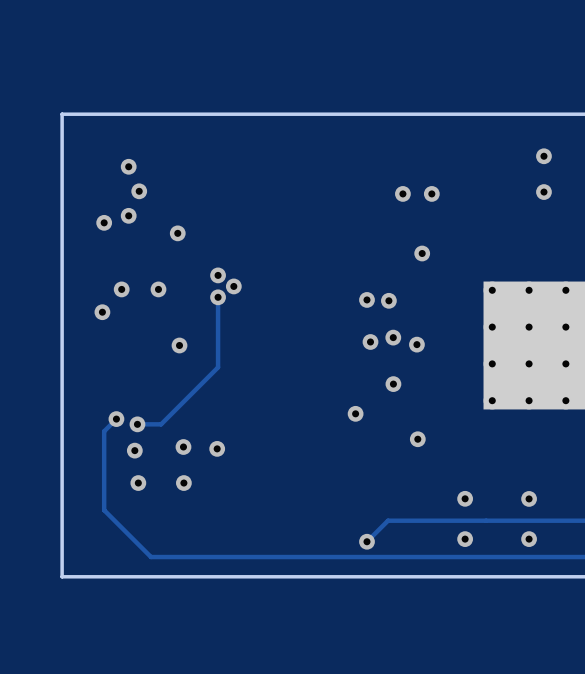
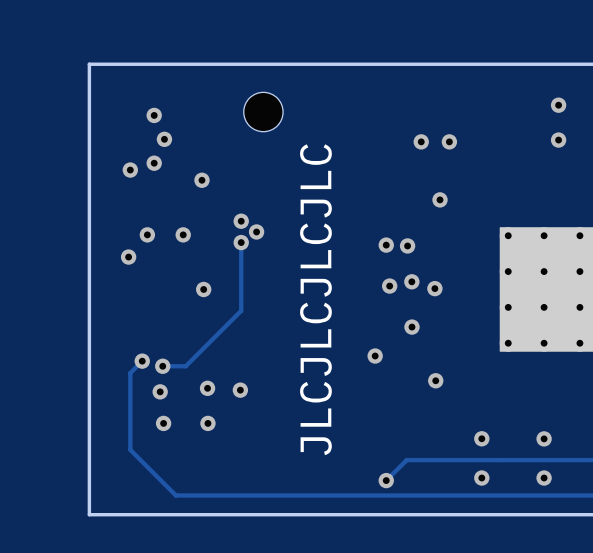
part: none -> (263, 112)
text: none -> JLCJLCJLCJLC (315, 299)

